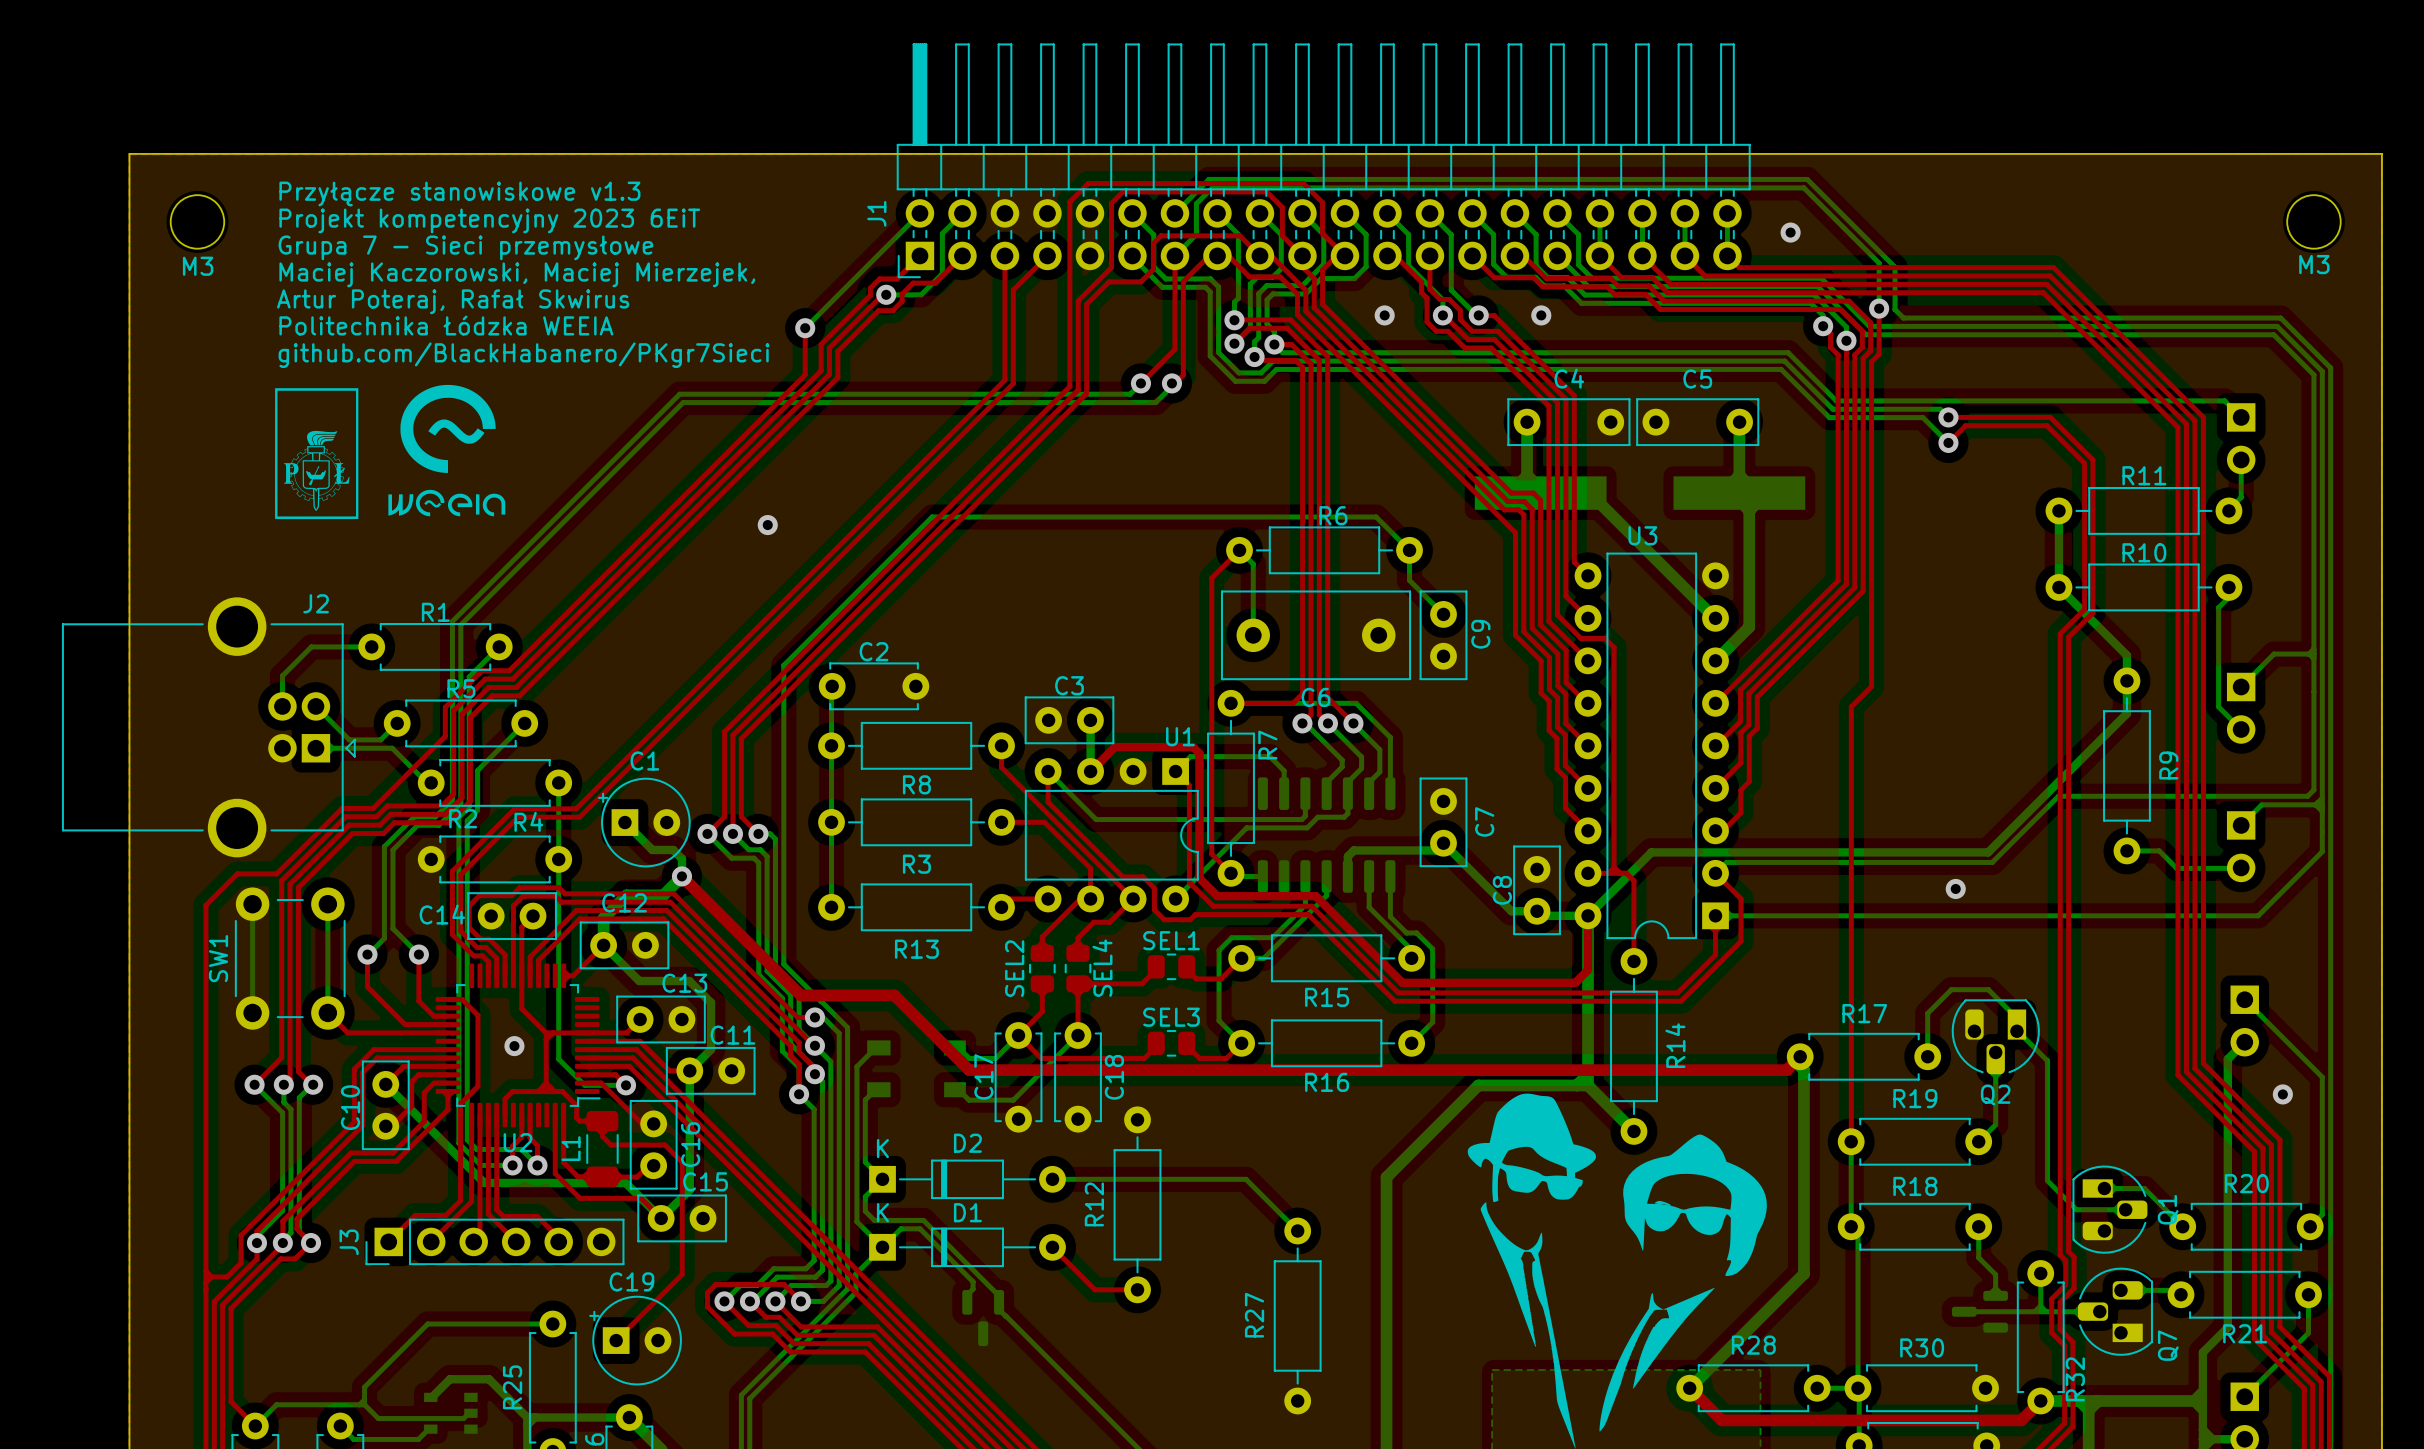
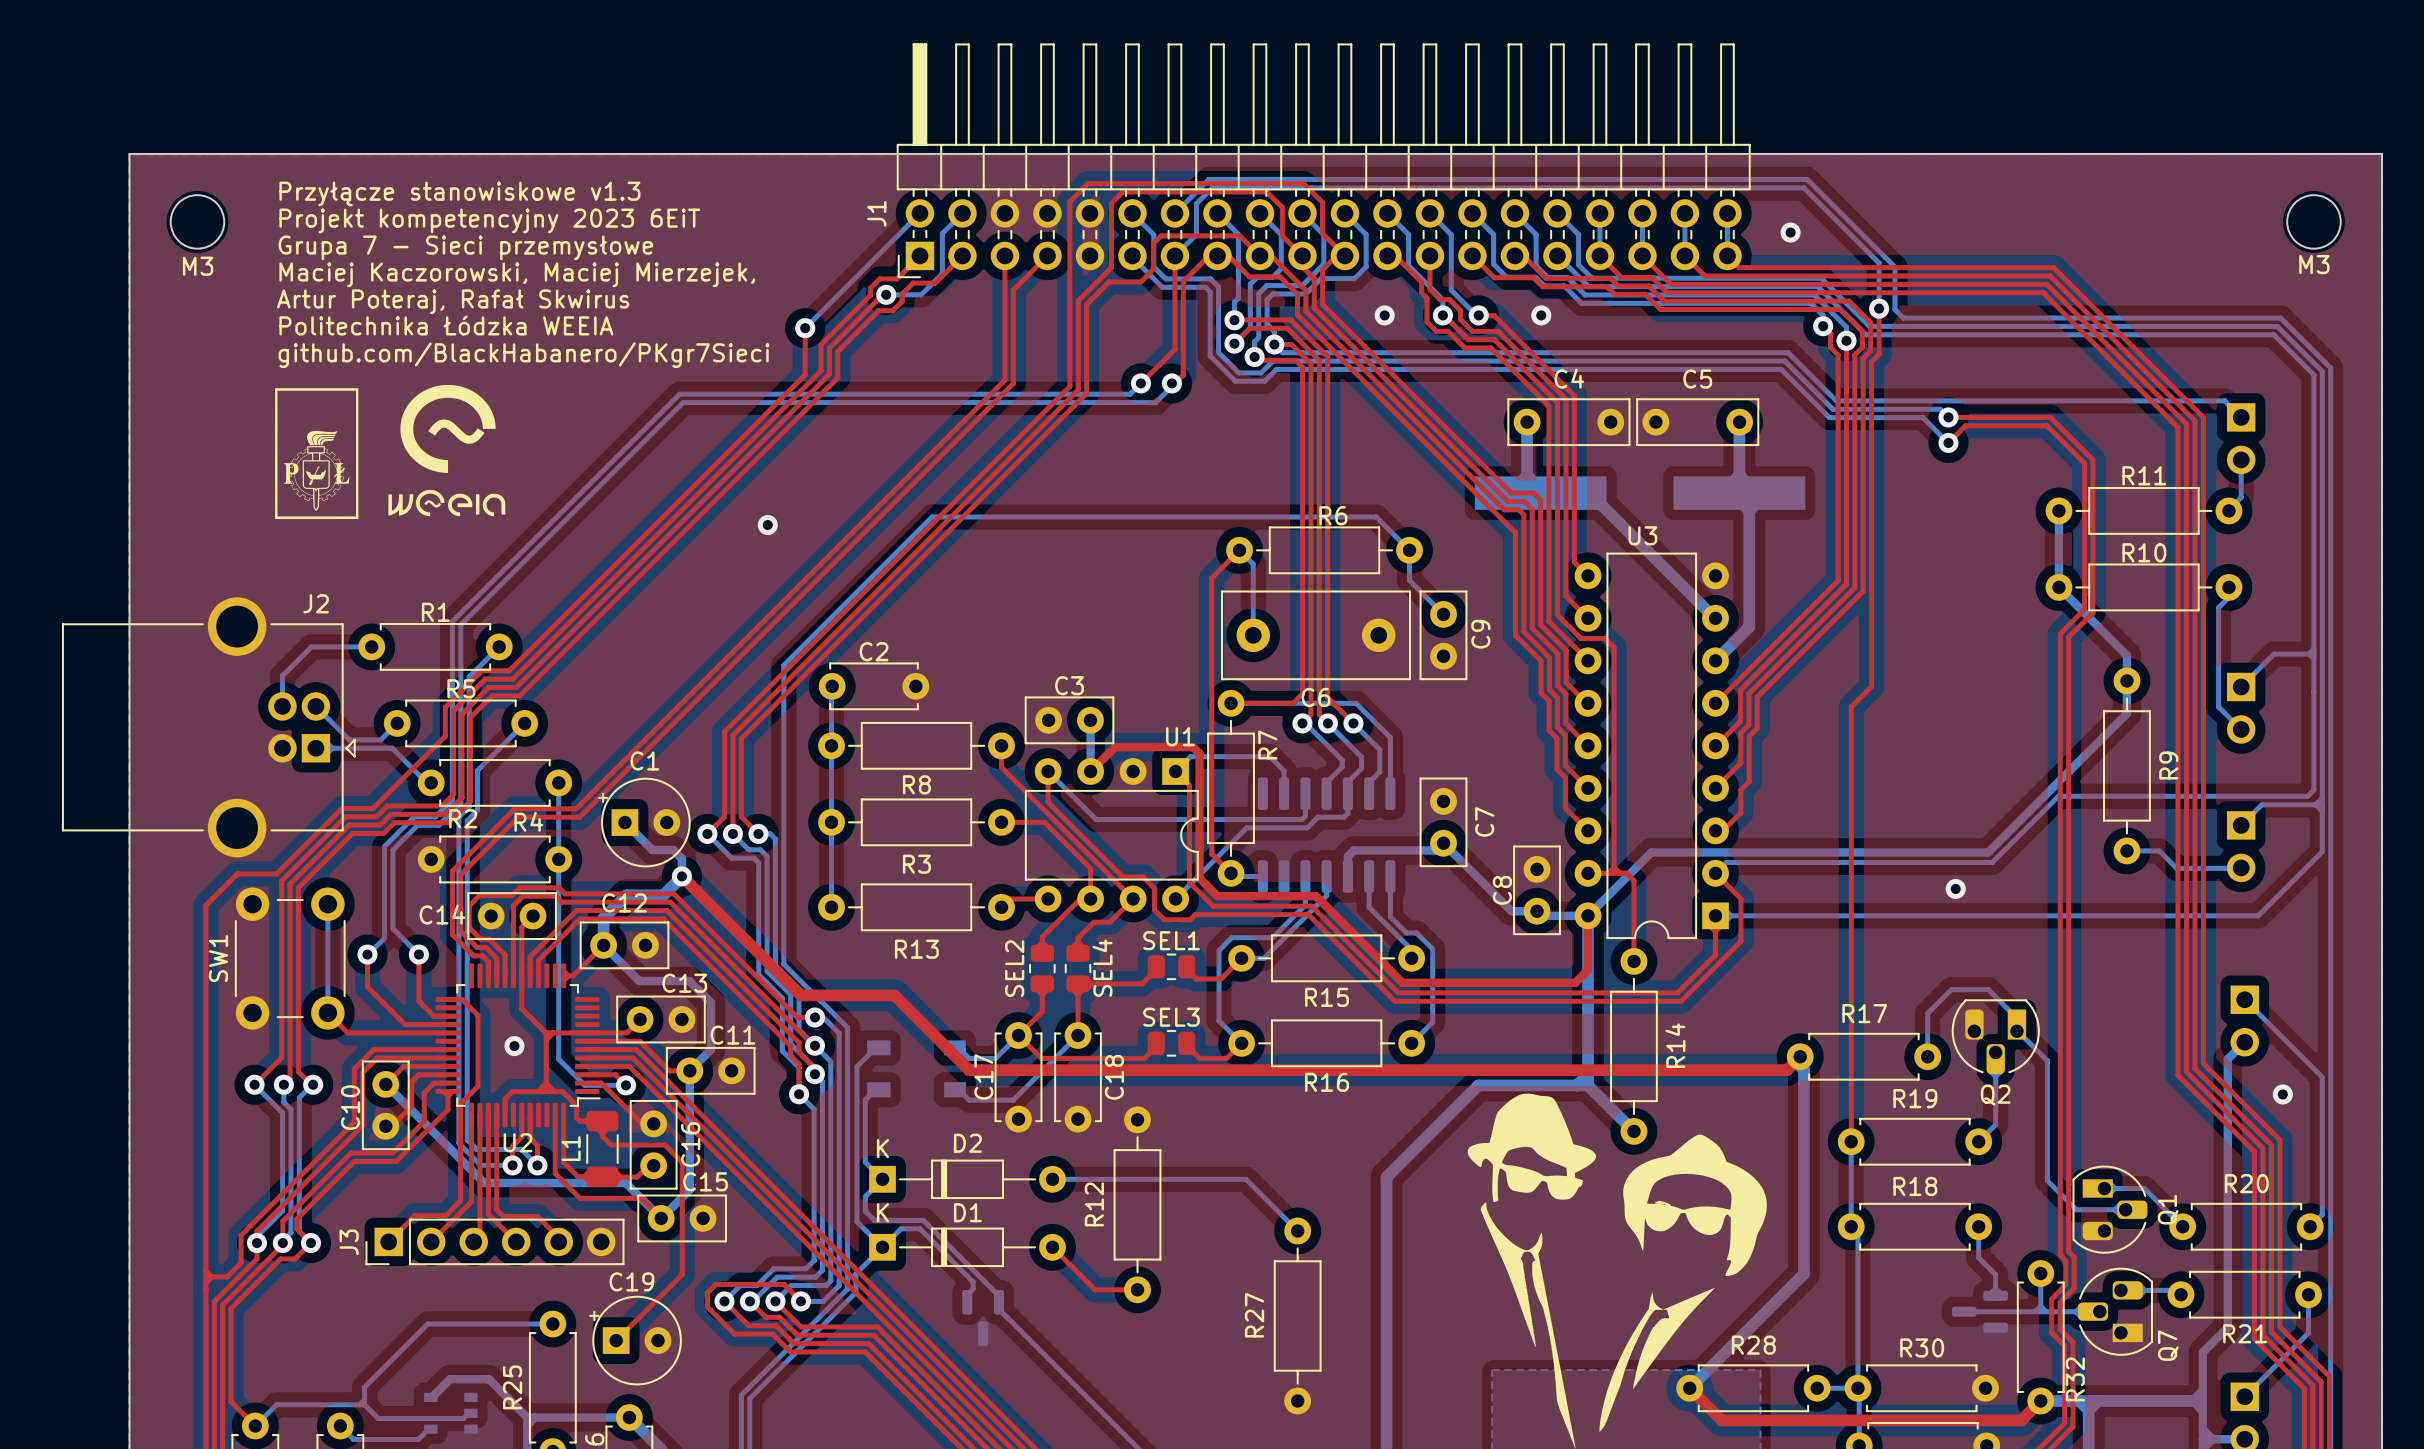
bottom track: (252, 904) (252, 1012) -> none

